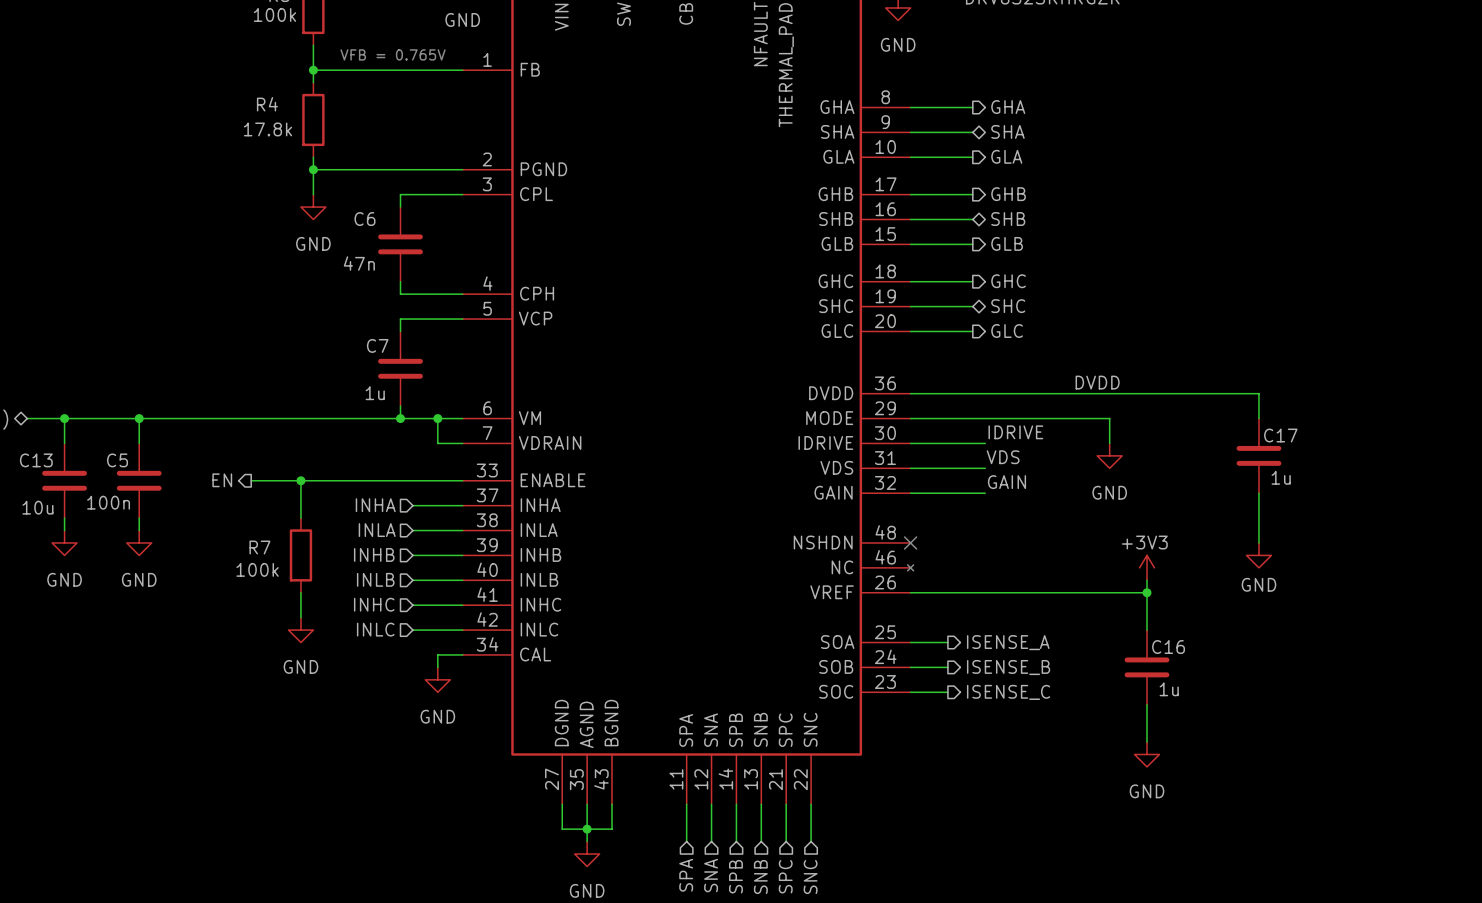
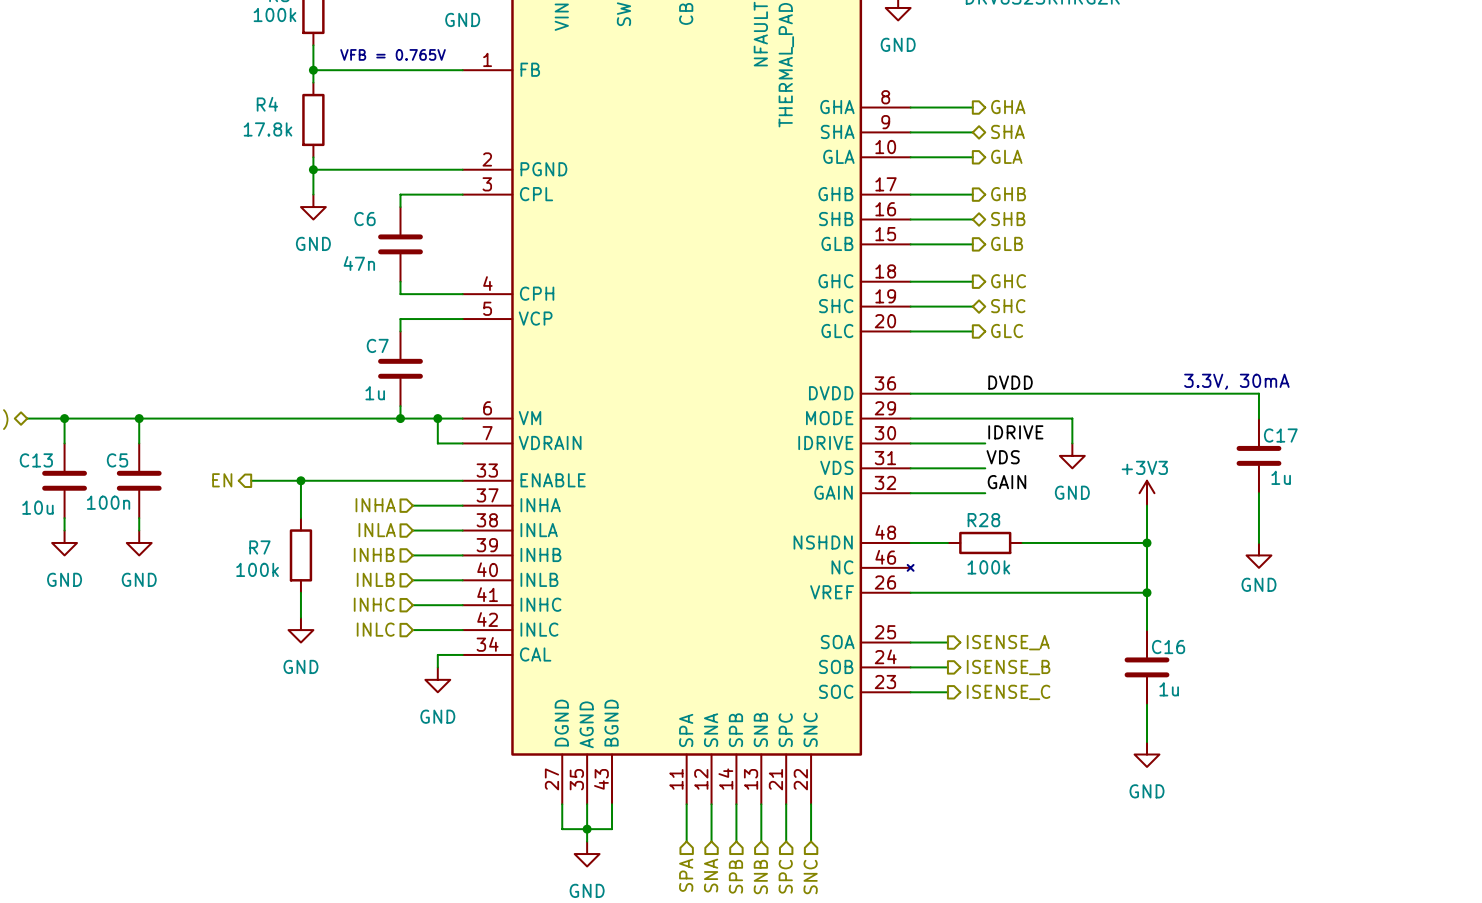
text: none -> 3.3V, 30mA (1236, 381)
label position: DVDD (1097, 382) -> DVDD (1010, 382)
wire: (1072, 418) (1109, 418) (1109, 443) -> (1072, 418) (1072, 443)
power symbol position: GND (1109, 455) -> GND (1072, 455)
wire: none -> (1147, 505) (1147, 580)
wire: none -> (910, 542) (947, 542)
no-connect mark: (910, 542) -> none
R28: none -> 100k (985, 542)
wire: none -> (1022, 542) (1147, 542)
junction: none -> (1147, 542)
power symbol position: +3V3 (1147, 567) -> +3V3 (1147, 493)

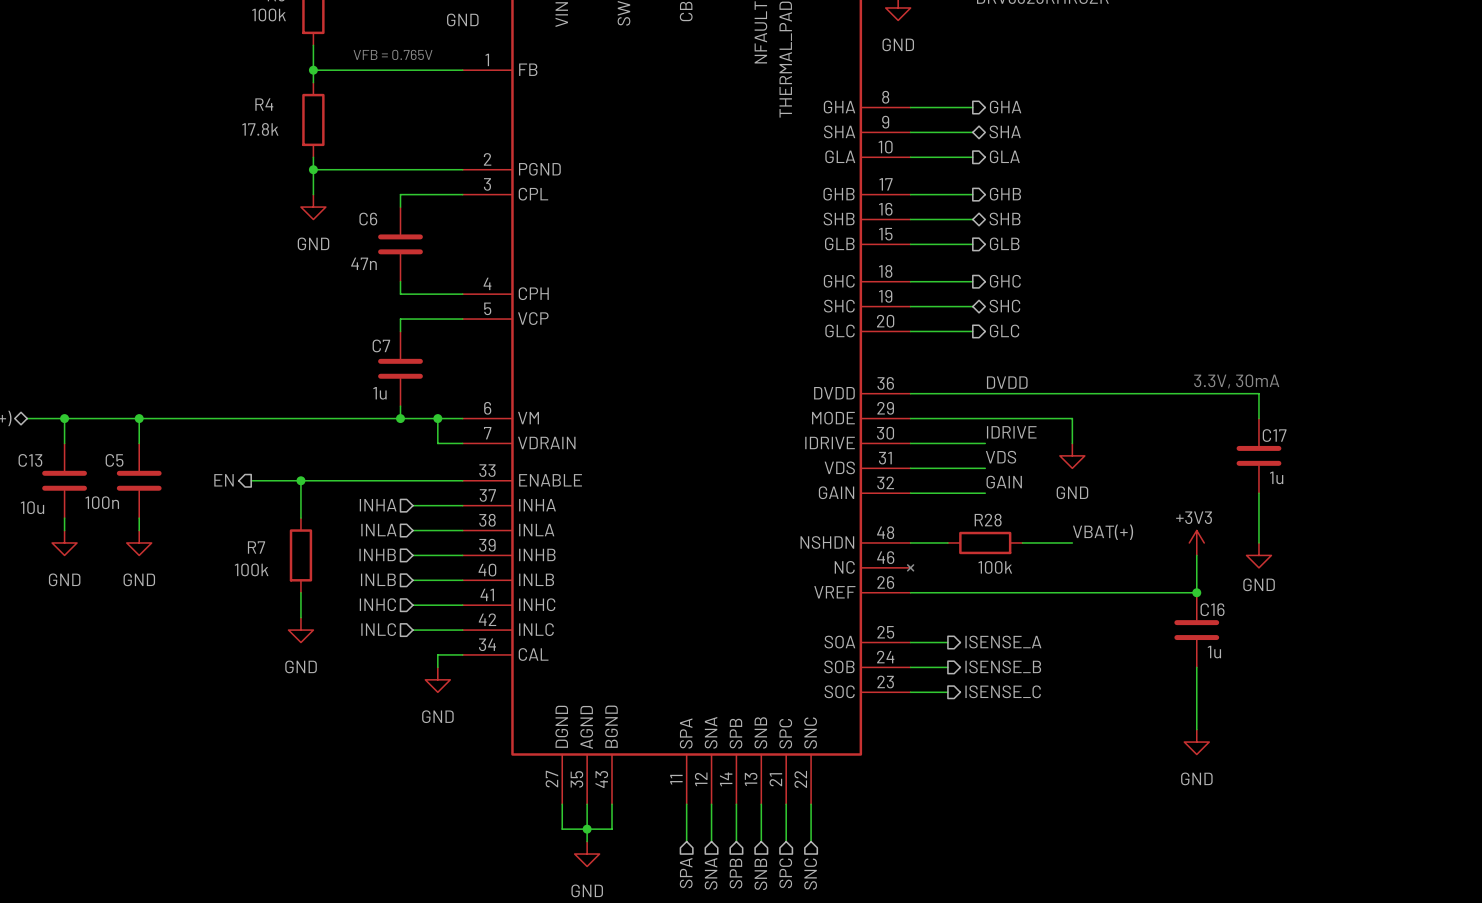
power symbol position: +3V3 (1147, 493) -> +3V3 (1196, 542)
wire: (1147, 505) (1147, 630) -> none
label: none -> VBAT(+) (1103, 532)
wire: (1072, 542) (1147, 542) -> none
junction: (1147, 542) -> none
wire: none -> (1196, 555) (1196, 592) (1147, 592)
junction: (1147, 592) -> none
junction: none -> (1196, 592)
C16 position: (1147, 667) -> (1196, 630)
wire: none -> (1196, 667) (1196, 729)
wire: (1147, 704) (1147, 742) -> none
power symbol position: GND (1147, 754) -> GND (1196, 742)

